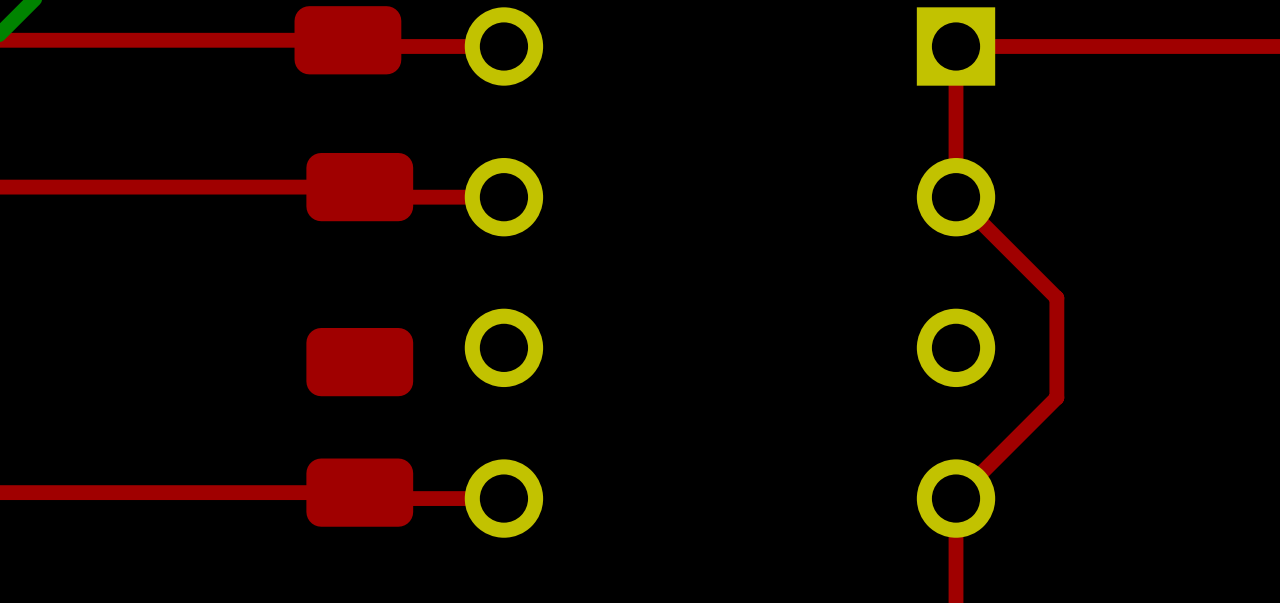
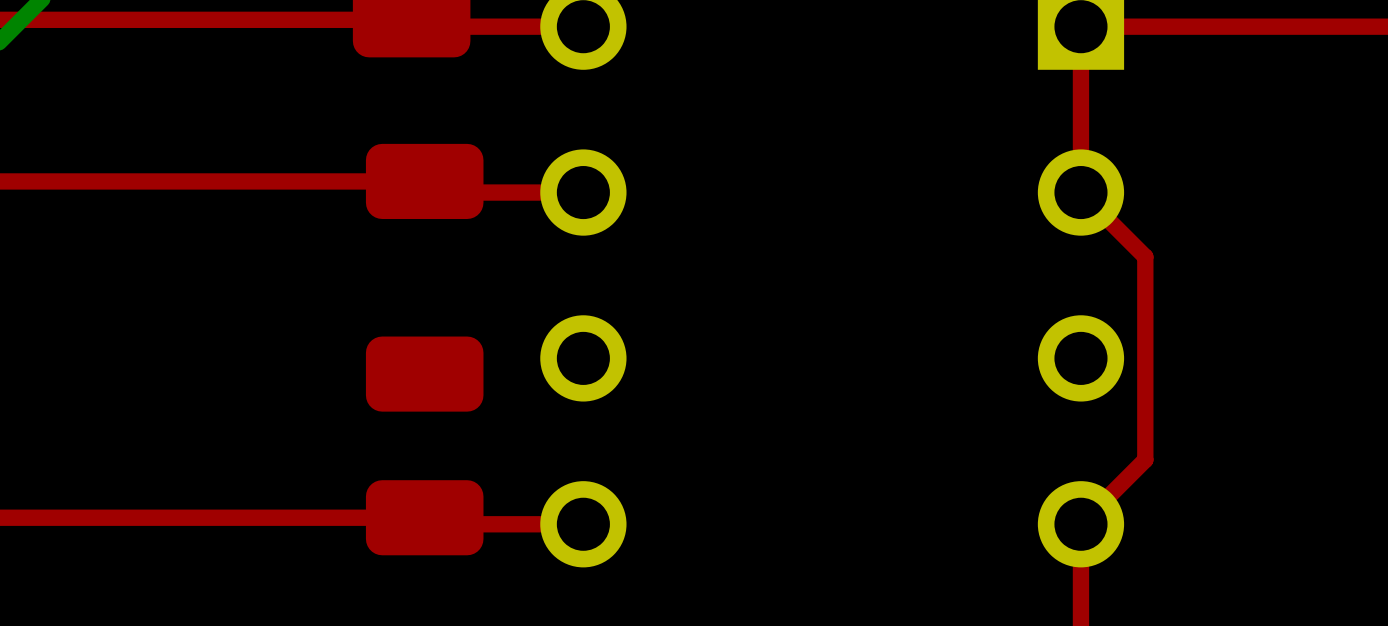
top track: (1014, 255) (1056, 298) (1056, 397) (1014, 440) -> (1145, 256) (1145, 459)

